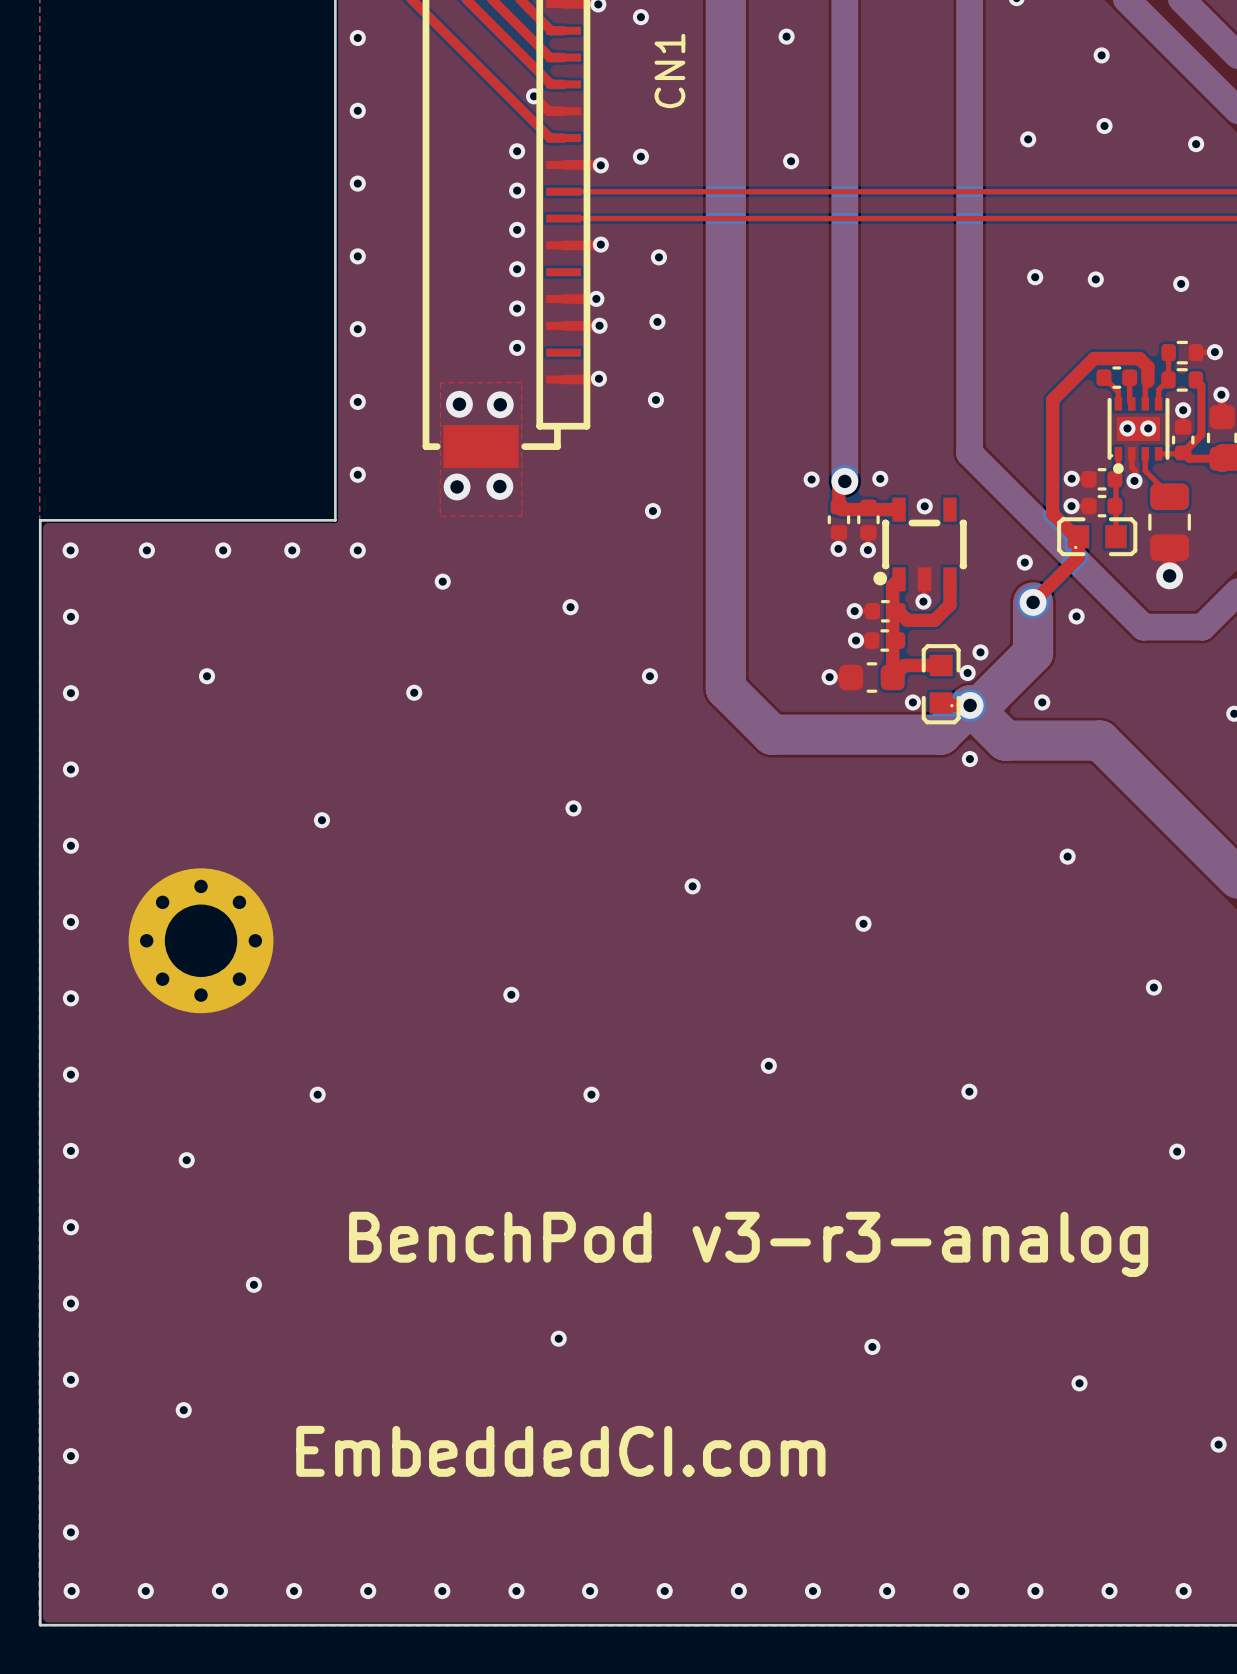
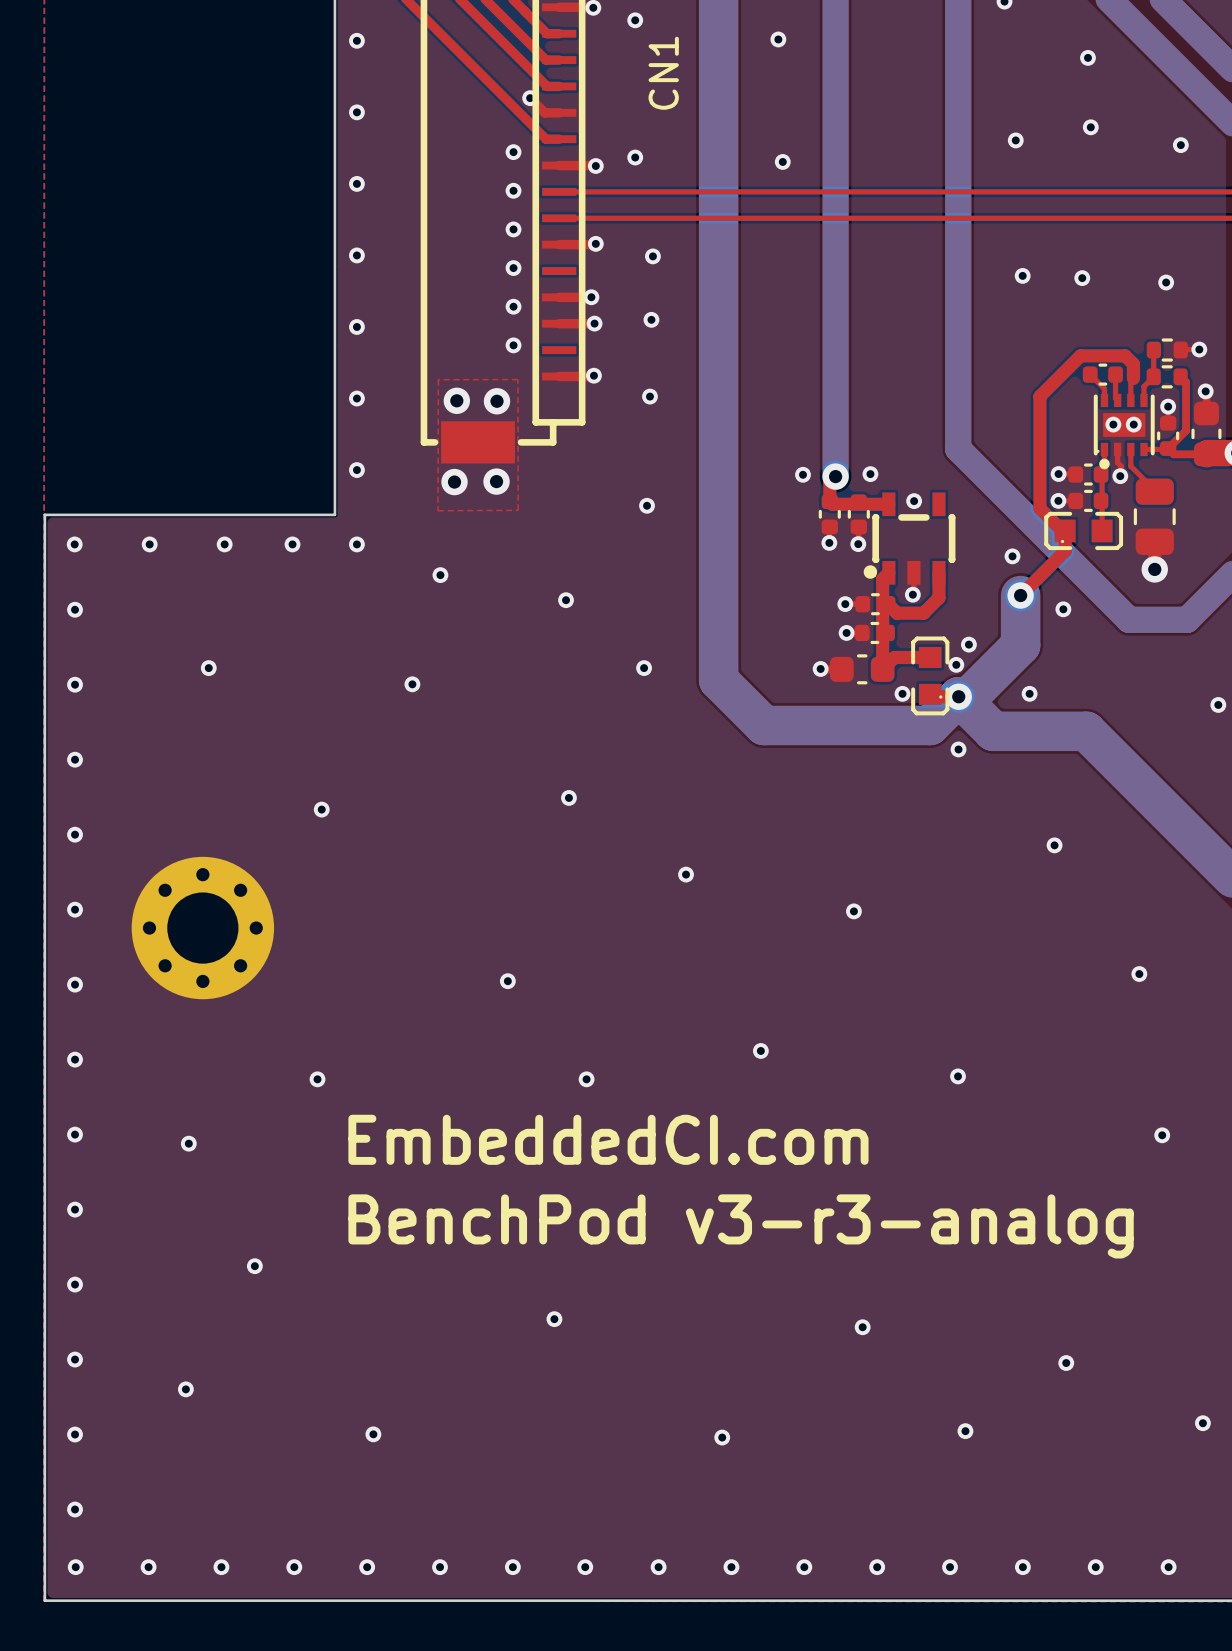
text position: EmbeddedCI.com (560, 1451) -> EmbeddedCI.com (608, 1139)
via: none -> (965, 1431)
via: none -> (373, 1434)
via: none -> (722, 1437)

